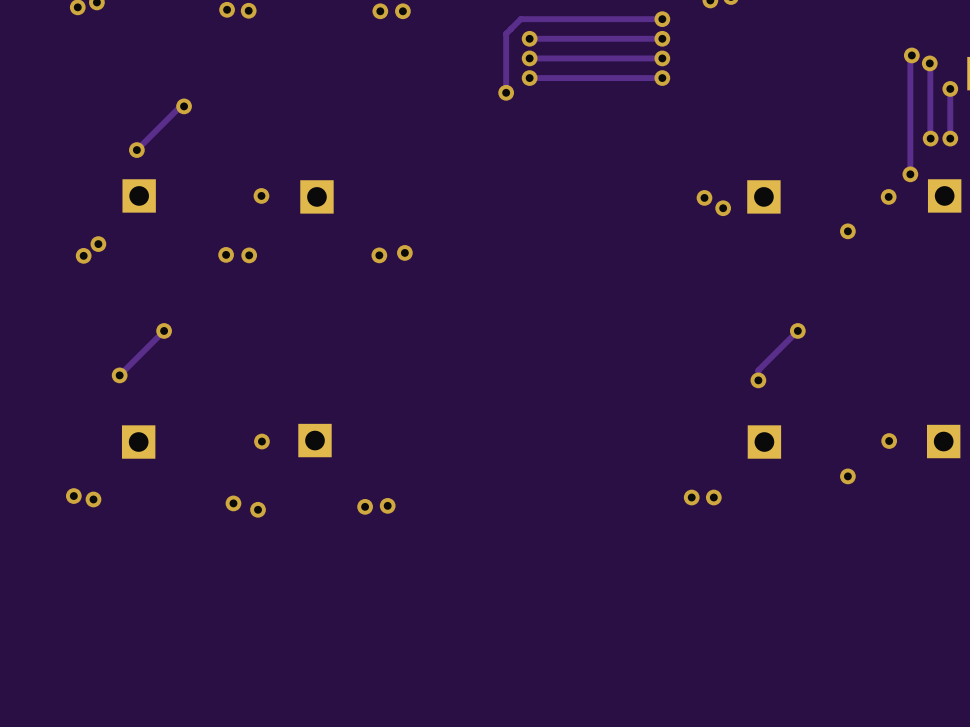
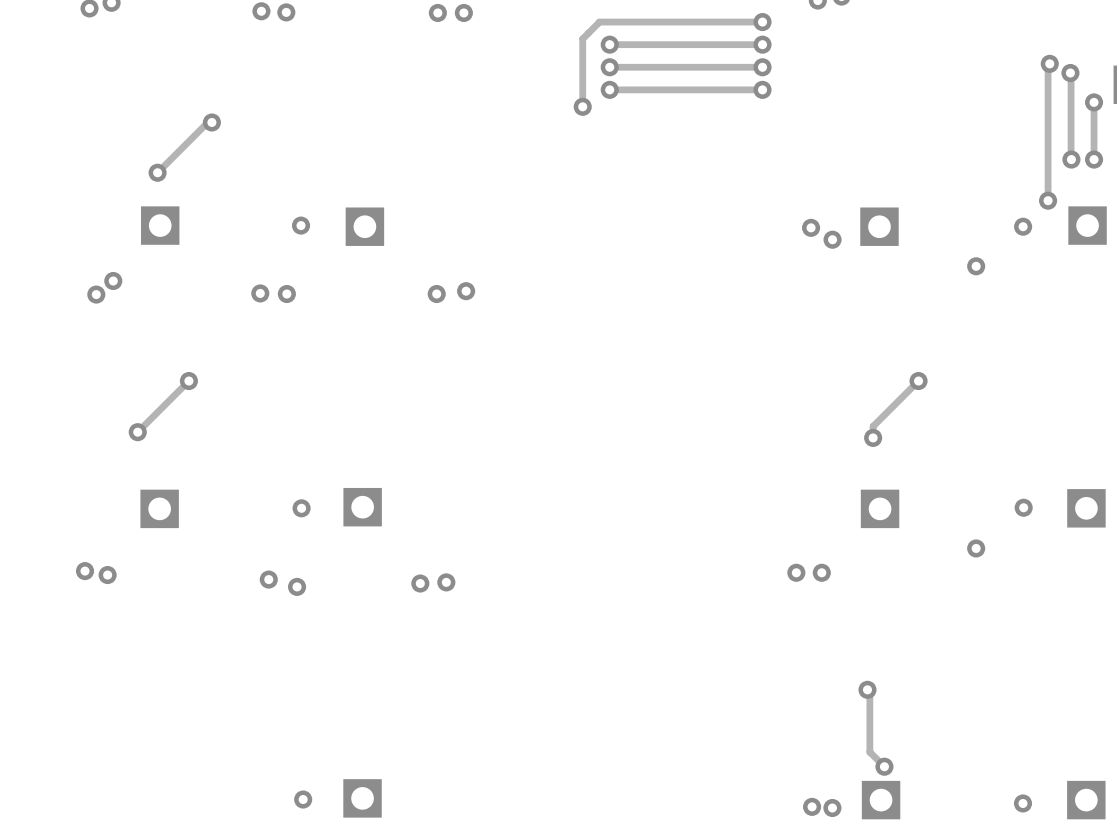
track: none -> (867, 689) (869, 692) (869, 752) (884, 766)
via: none -> (867, 689)
via: none -> (884, 766)
part: none -> (362, 798)
via: none -> (303, 799)
part: none -> (881, 800)
part: none -> (1086, 800)
via: none -> (1022, 803)
via: none -> (812, 806)
via: none -> (832, 808)

